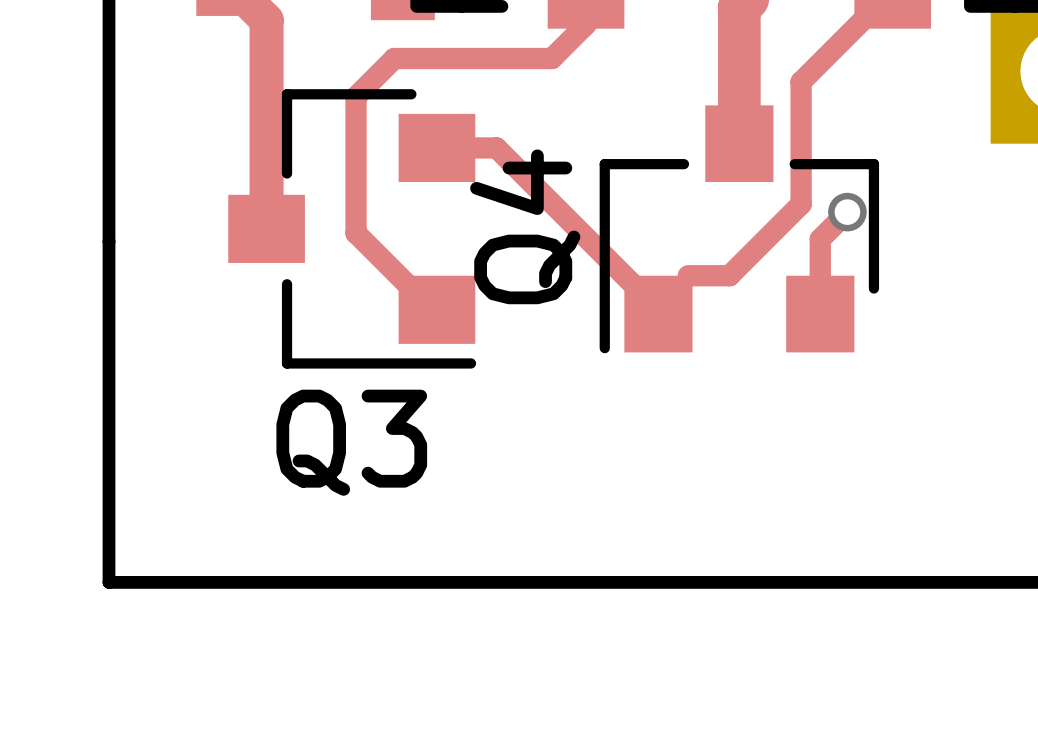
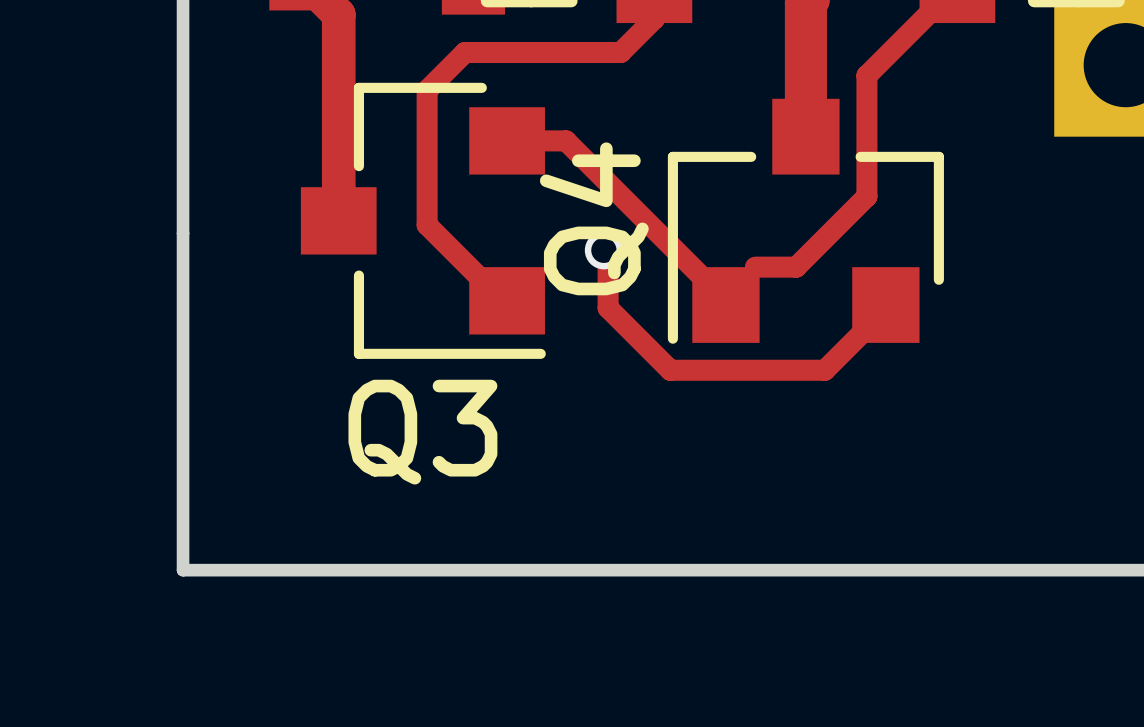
track: (847, 212) (820, 239) (820, 314) -> (603, 250) (608, 254) (608, 307) (670, 370) (824, 370) (885, 309) (885, 305)
via position: (847, 212) -> (603, 250)

